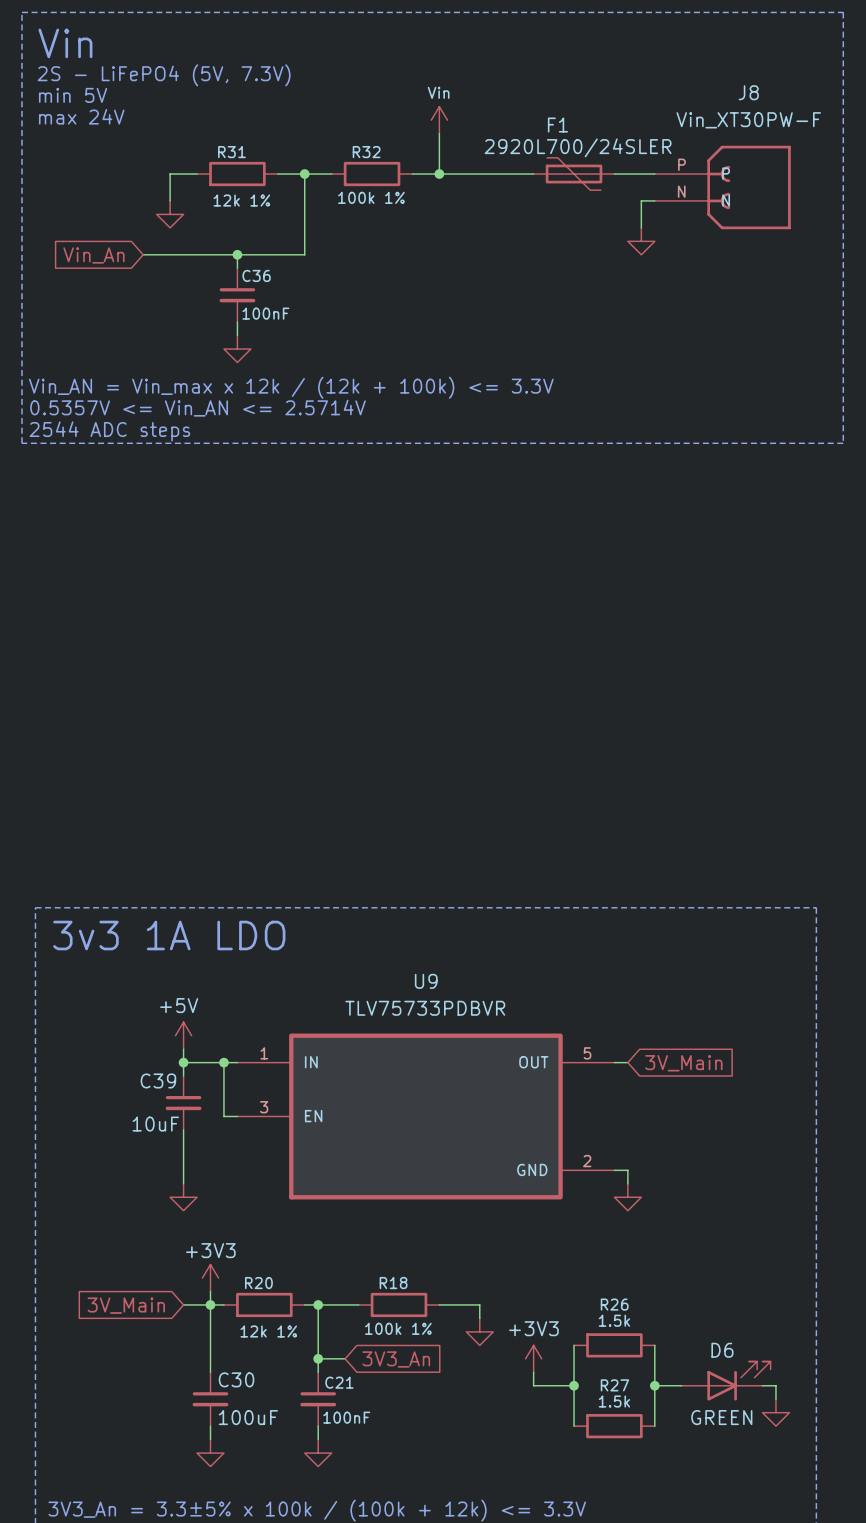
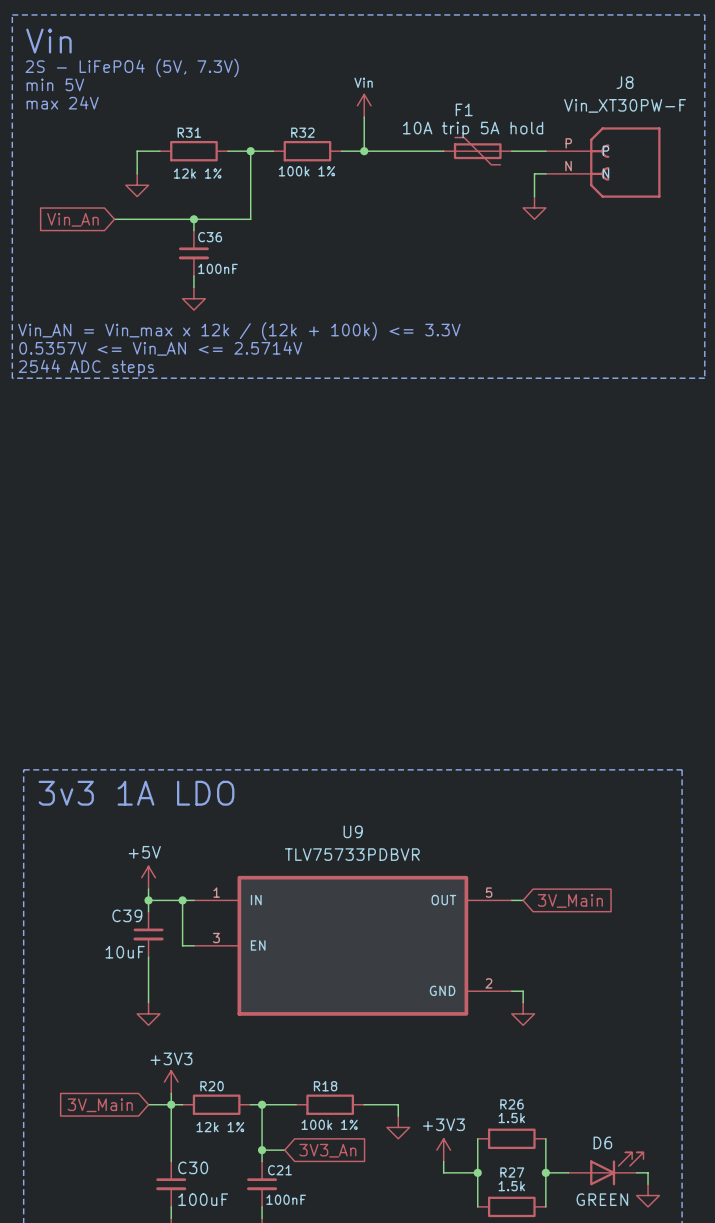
F1 value: 2920L700/24SLER (578, 147) -> 10A trip 5A hold (473, 129)

